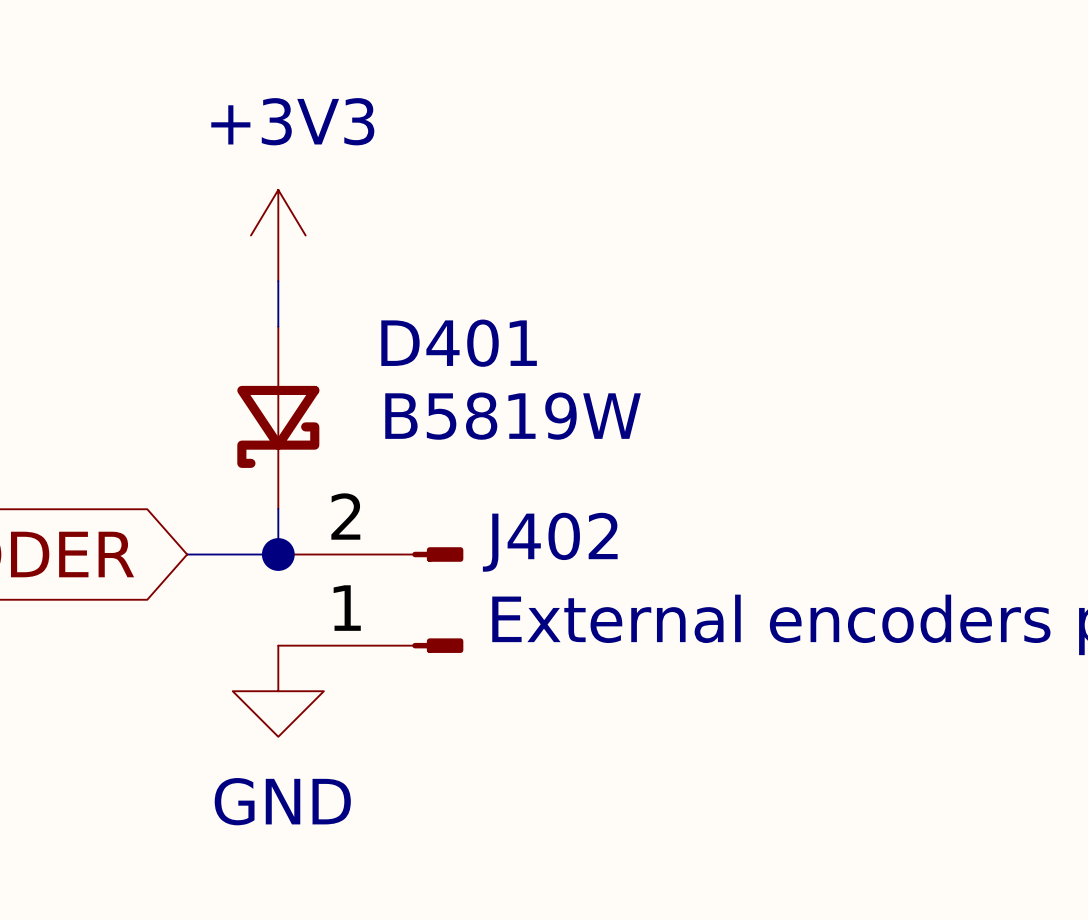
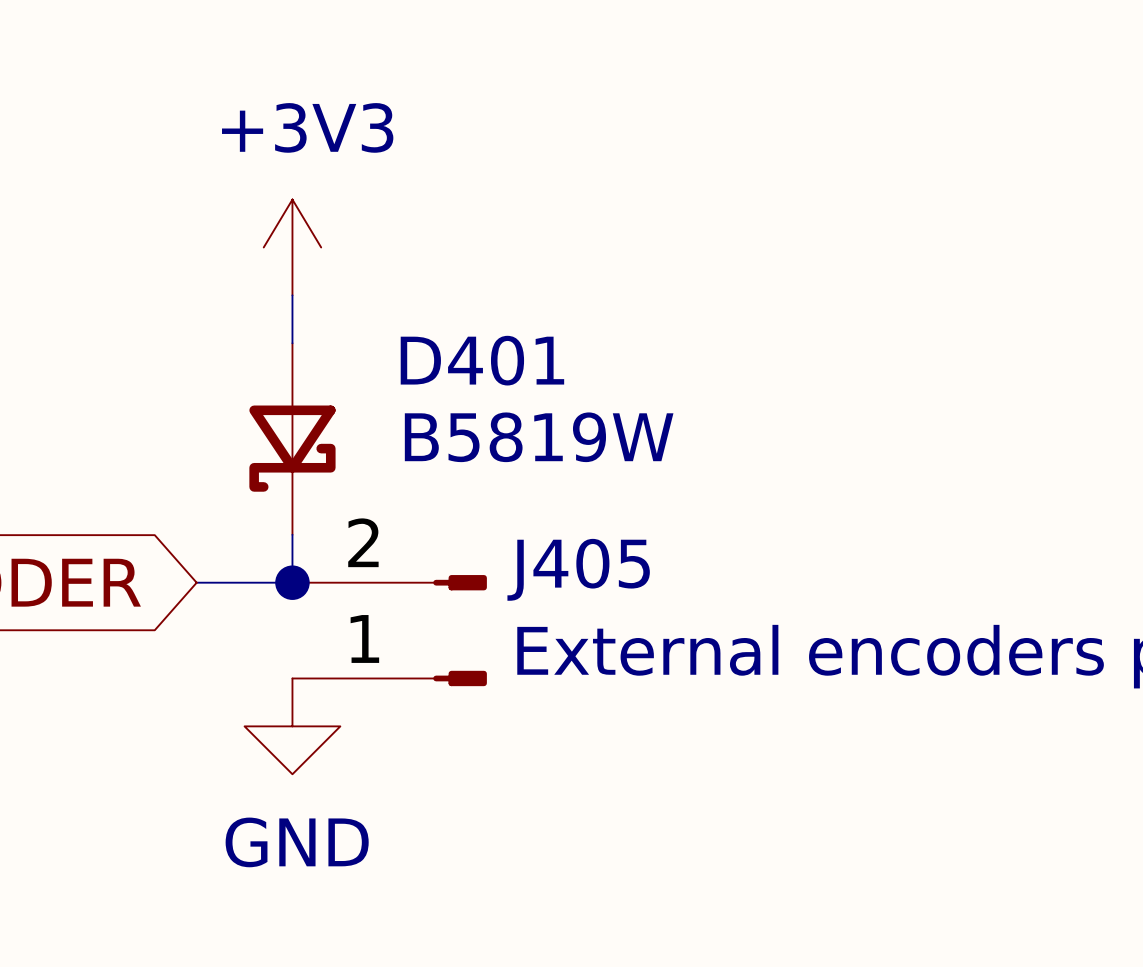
J402 name: J402 (550, 542) -> J405 (578, 569)

